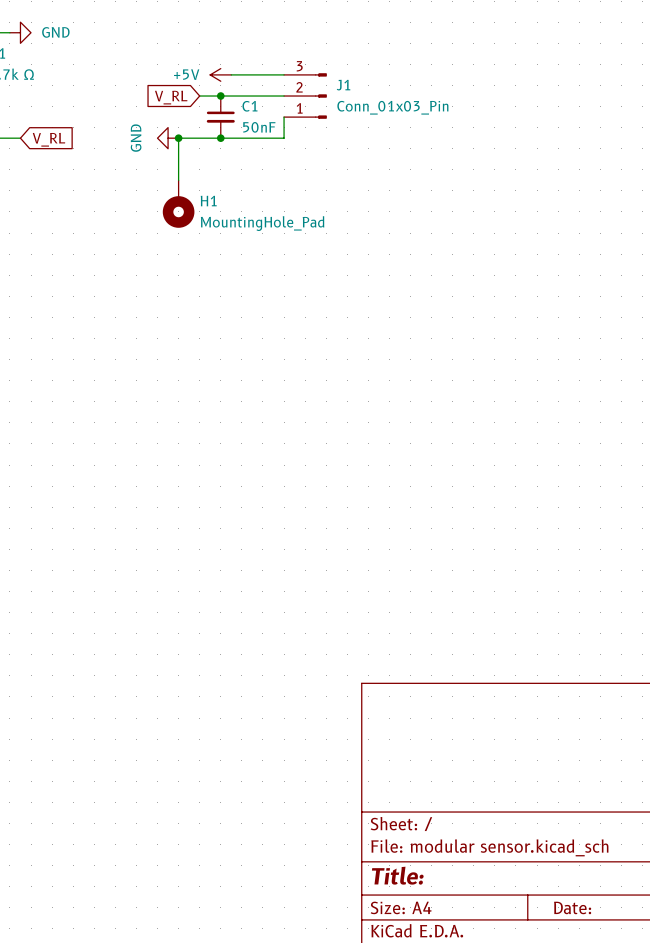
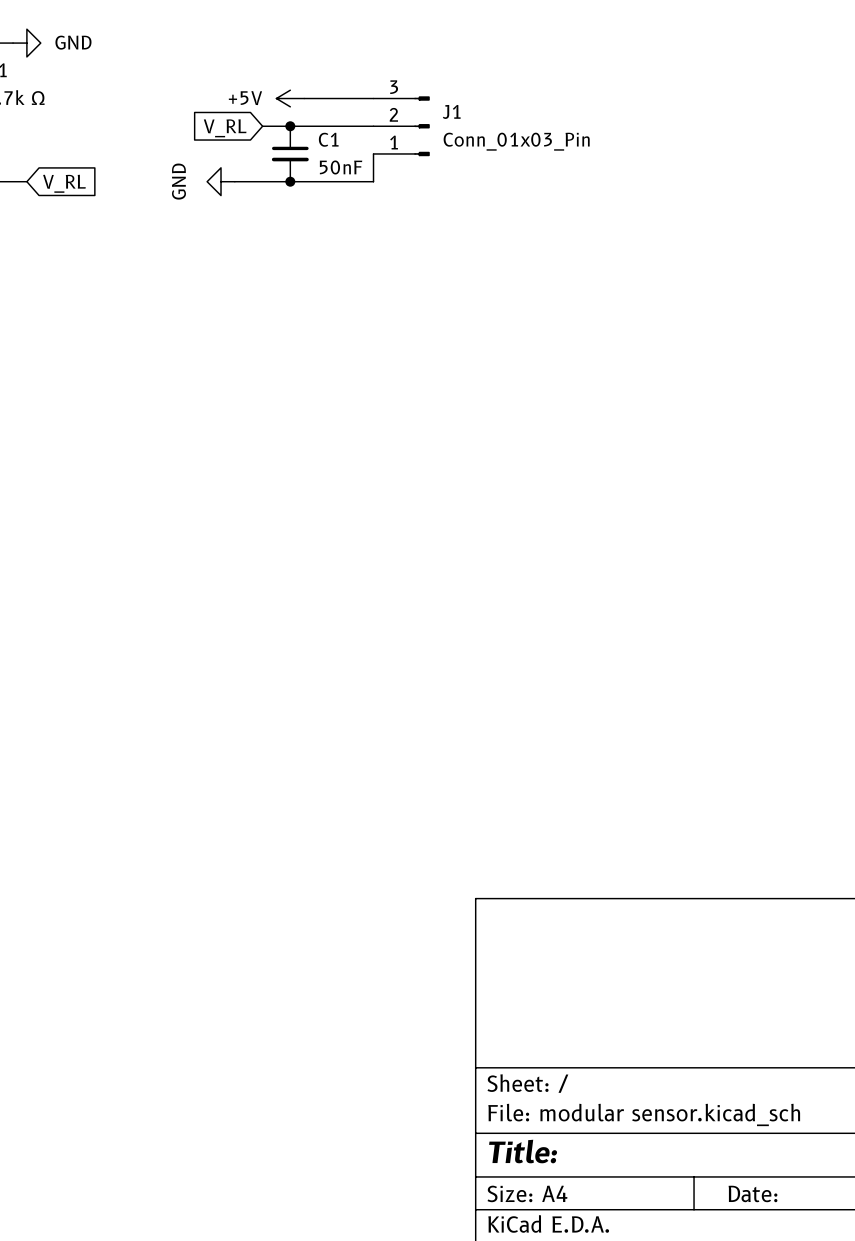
wire: (178, 138) (178, 180) -> none
junction: (178, 138) -> none
H1: MountingHole_Pad (178, 204) -> none

